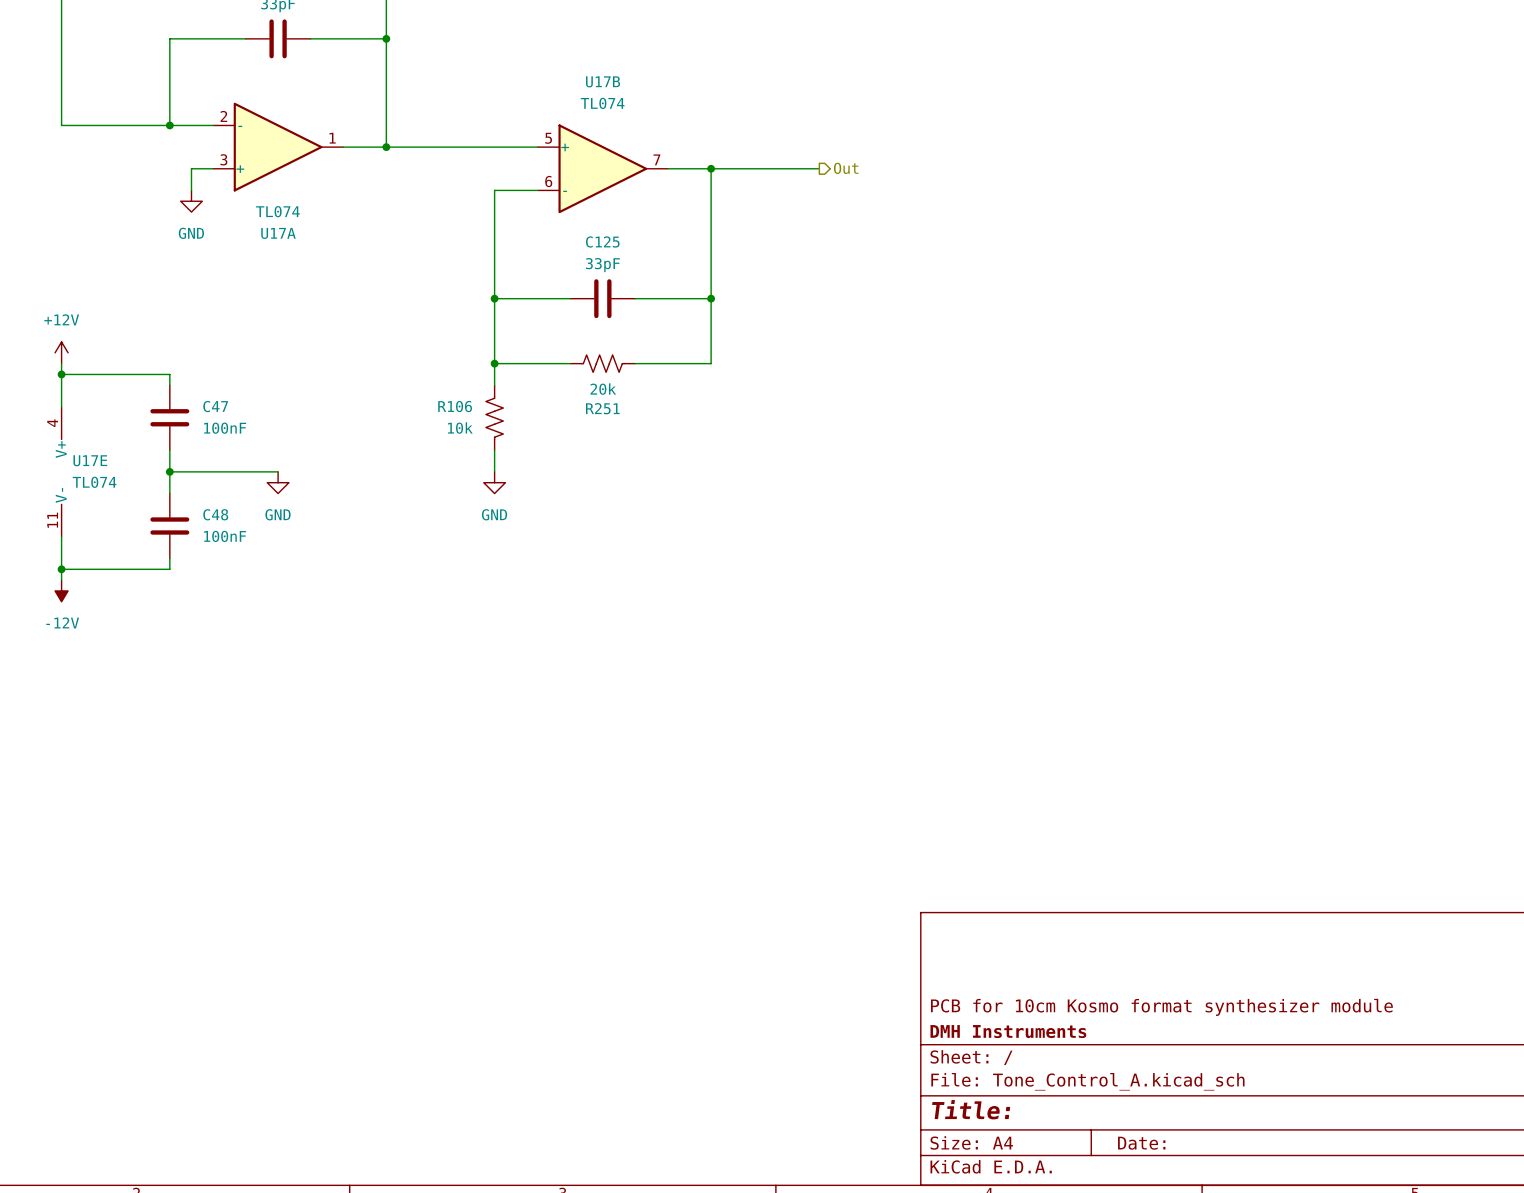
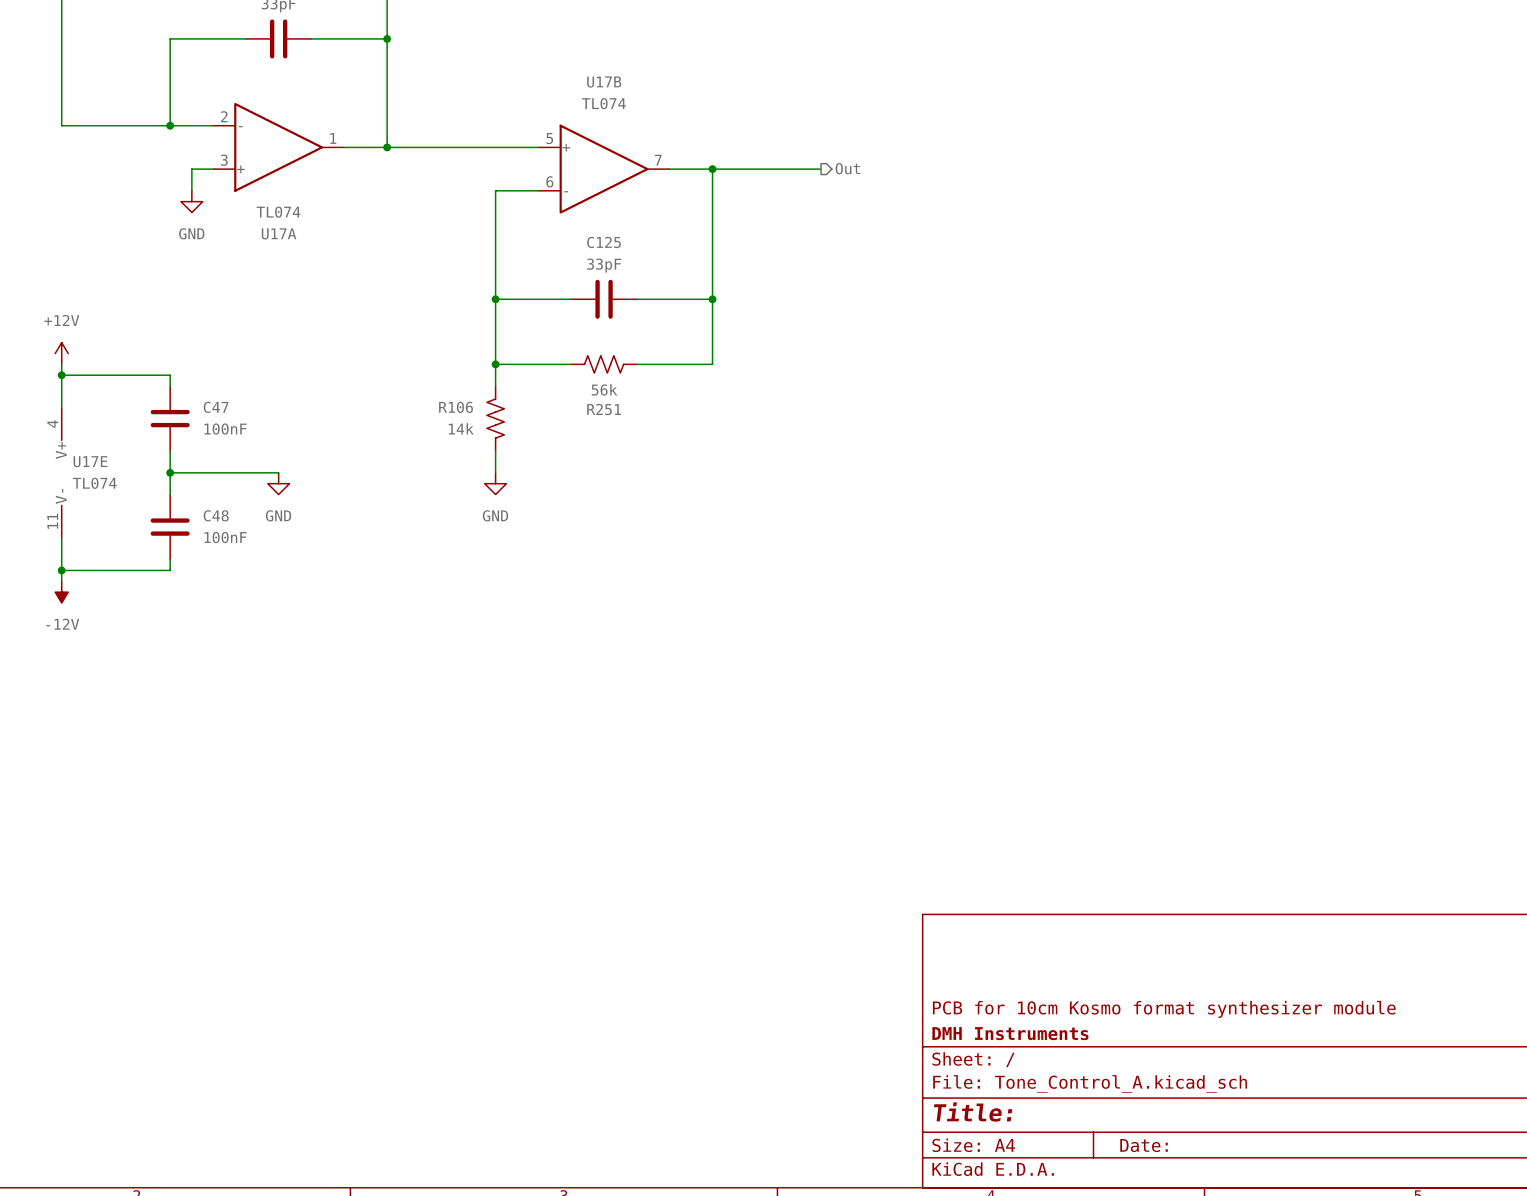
R251 value: 20k (603, 389) -> 56k (604, 389)
R106 value: 10k (460, 428) -> 14k (461, 428)

